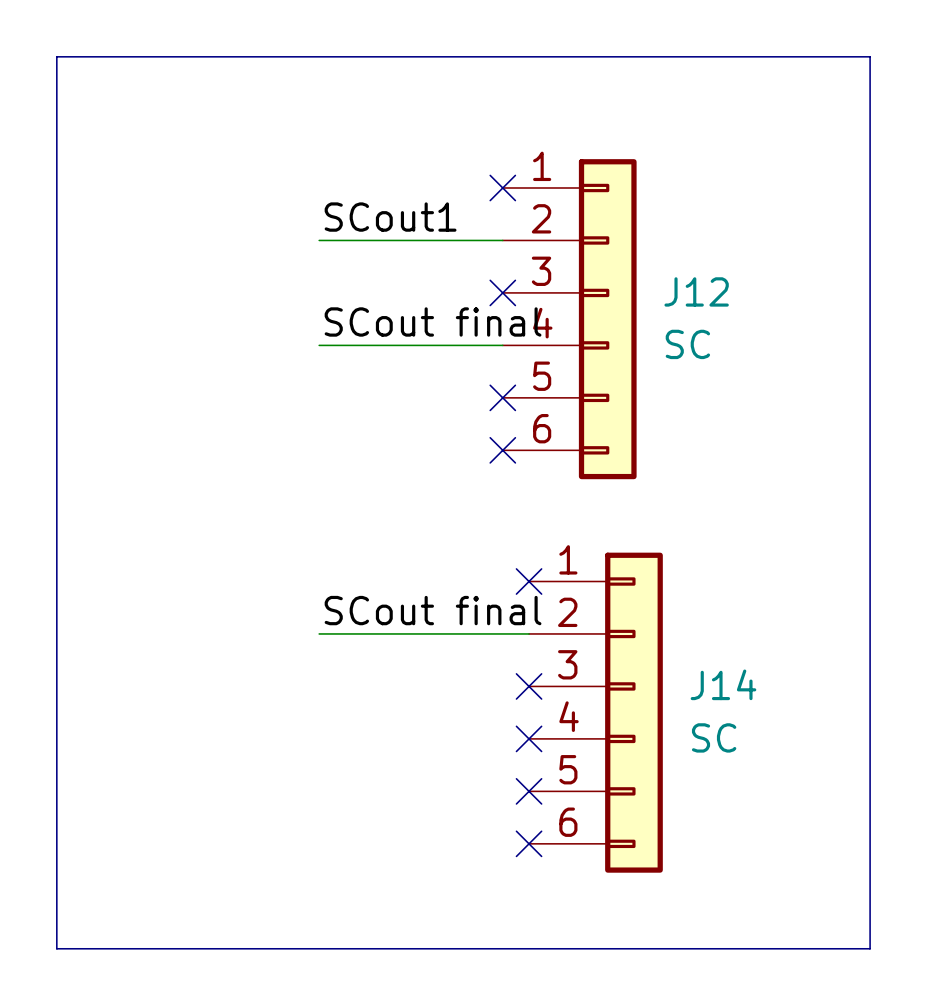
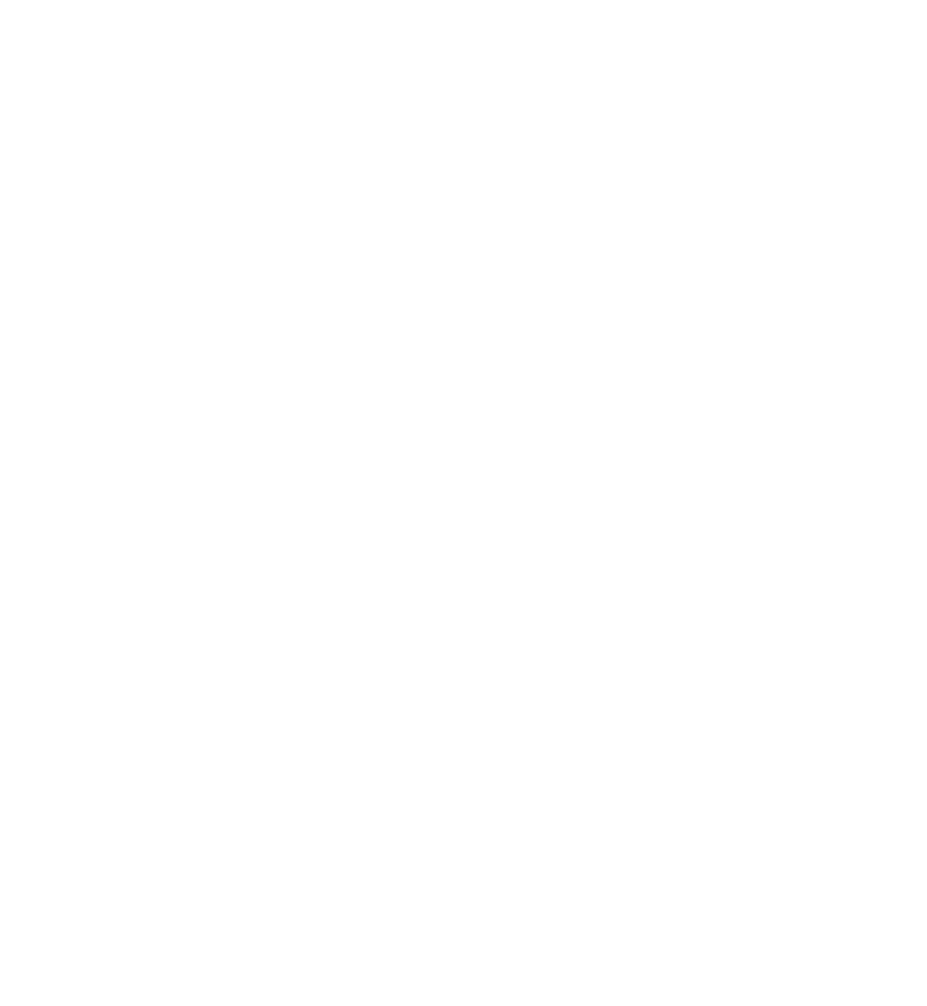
line: (56, 56) (870, 56) (870, 948) (56, 948) (56, 56) -> none
no-connect mark: (502, 187) -> none
label: SCout1 (390, 217) -> none
wire: (319, 240) (502, 240) -> none
no-connect mark: (502, 292) -> none
J12: SC (569, 319) -> none
label: SCout final (433, 321) -> none
wire: (319, 345) (502, 345) -> none
no-connect mark: (502, 397) -> none
no-connect mark: (502, 450) -> none
no-connect mark: (529, 581) -> none
label: SCout final (433, 610) -> none
wire: (319, 633) (529, 633) -> none
no-connect mark: (529, 686) -> none
J14: SC (595, 712) -> none
no-connect mark: (529, 738) -> none
no-connect mark: (529, 791) -> none
no-connect mark: (529, 843) -> none

